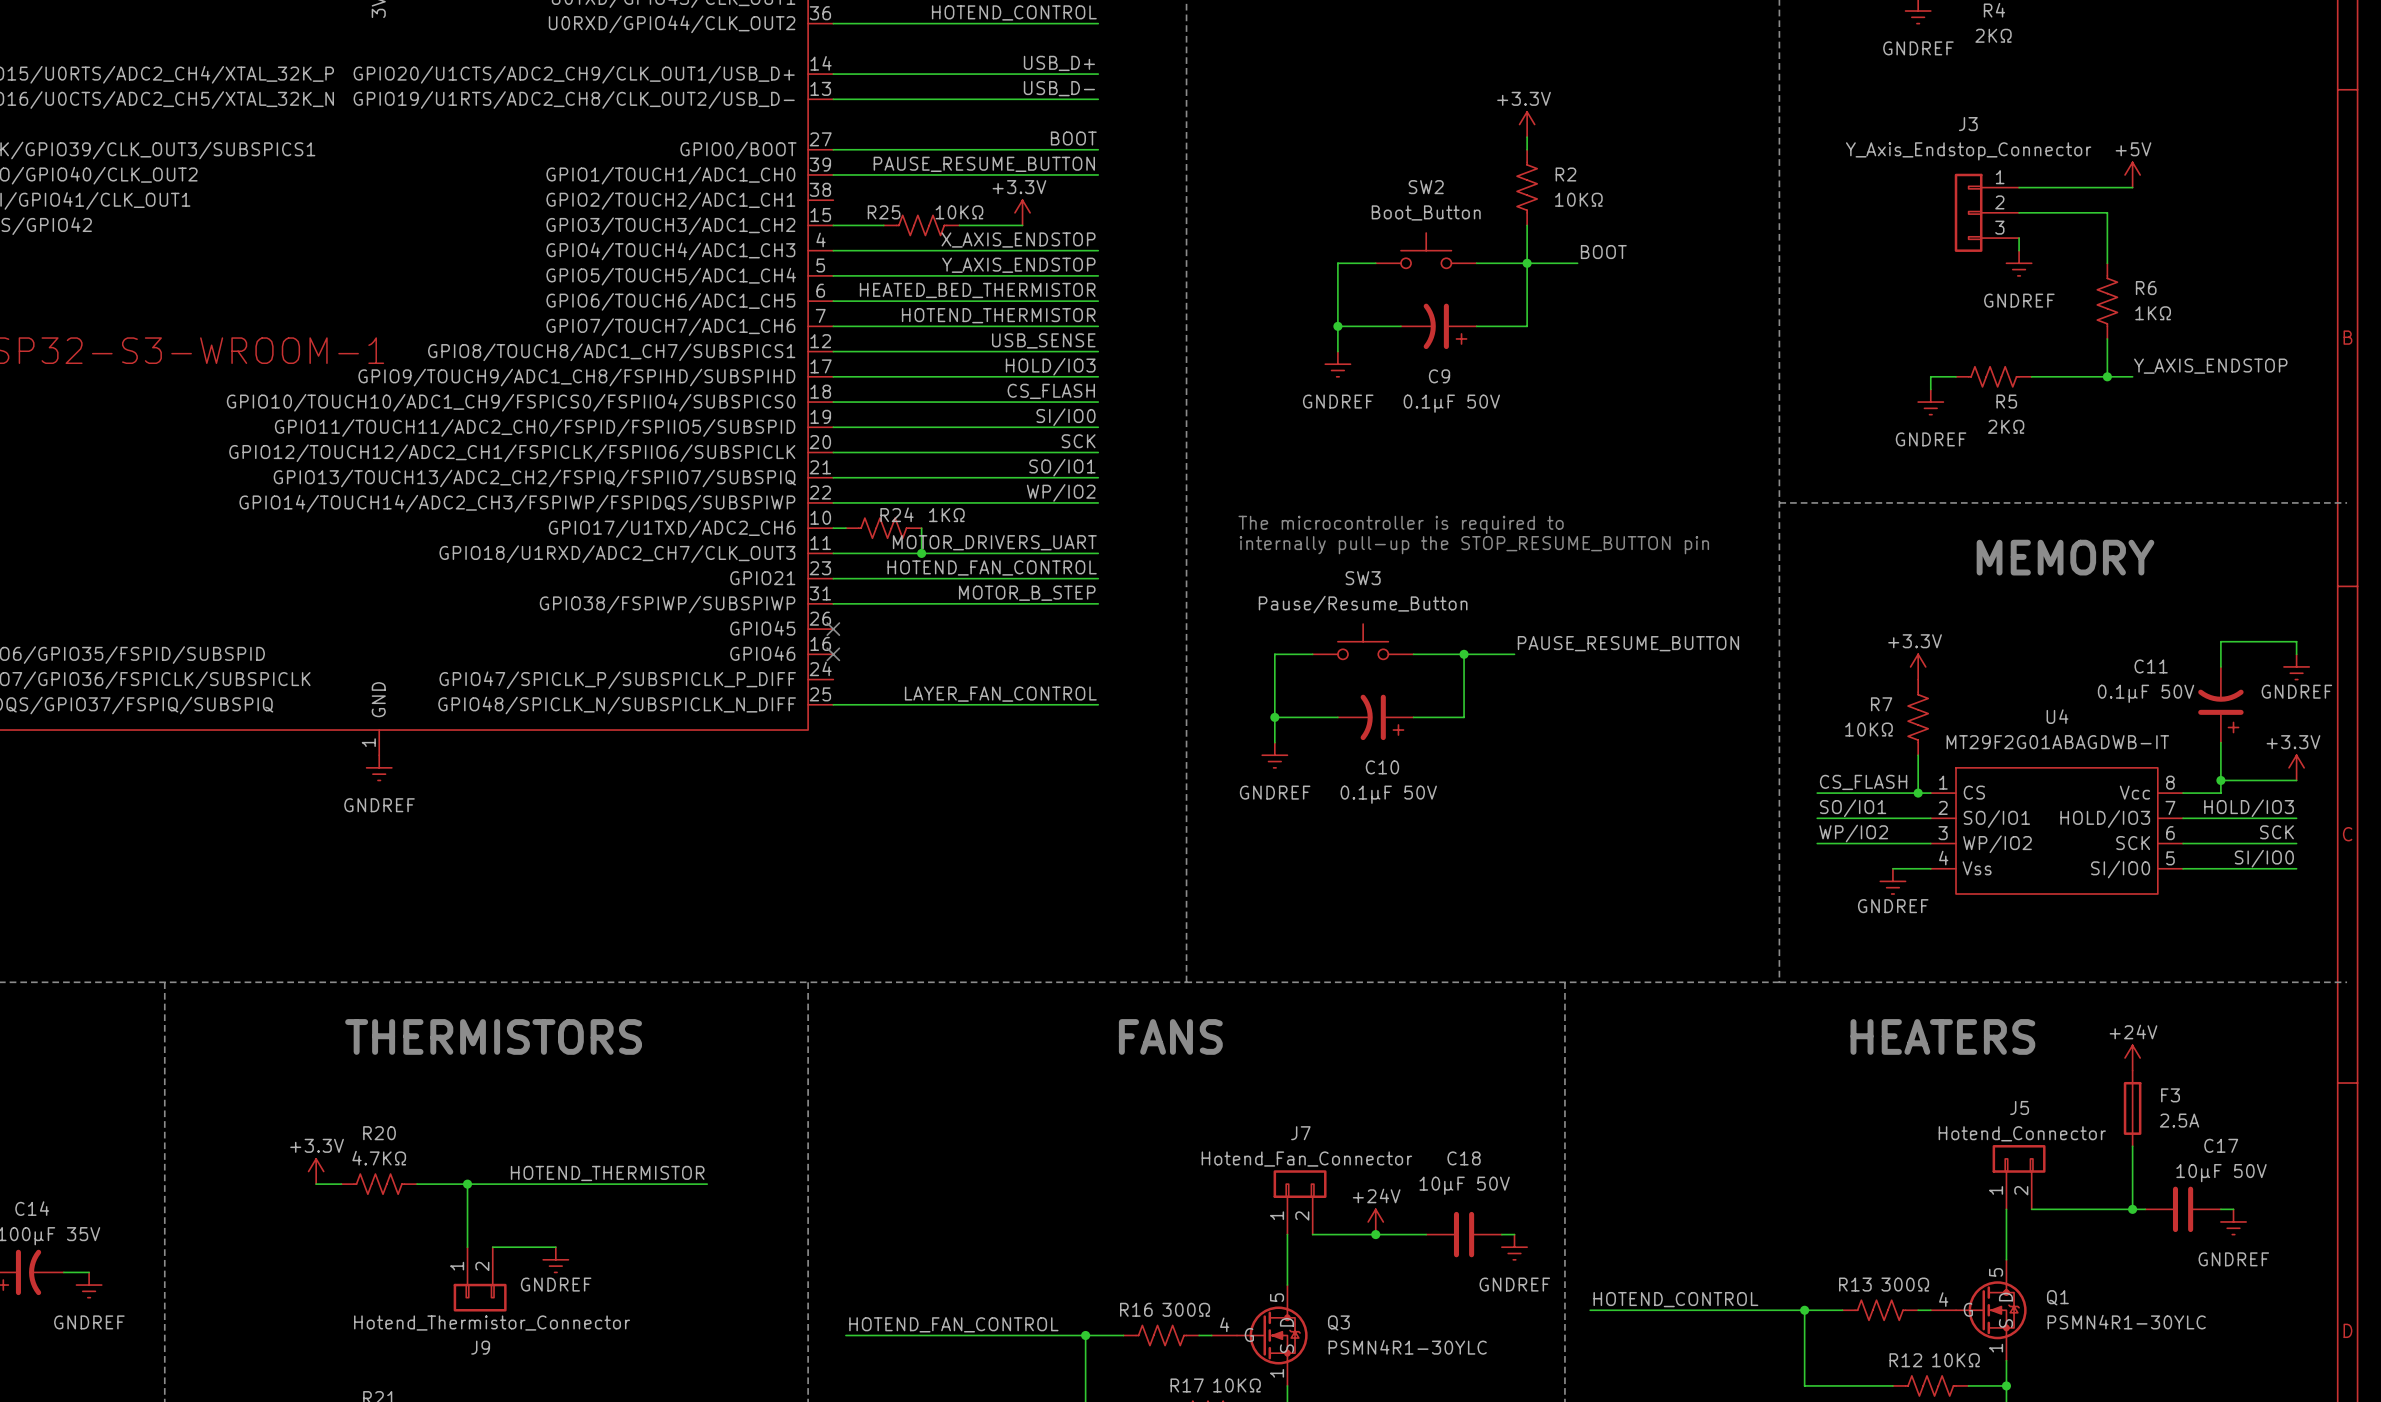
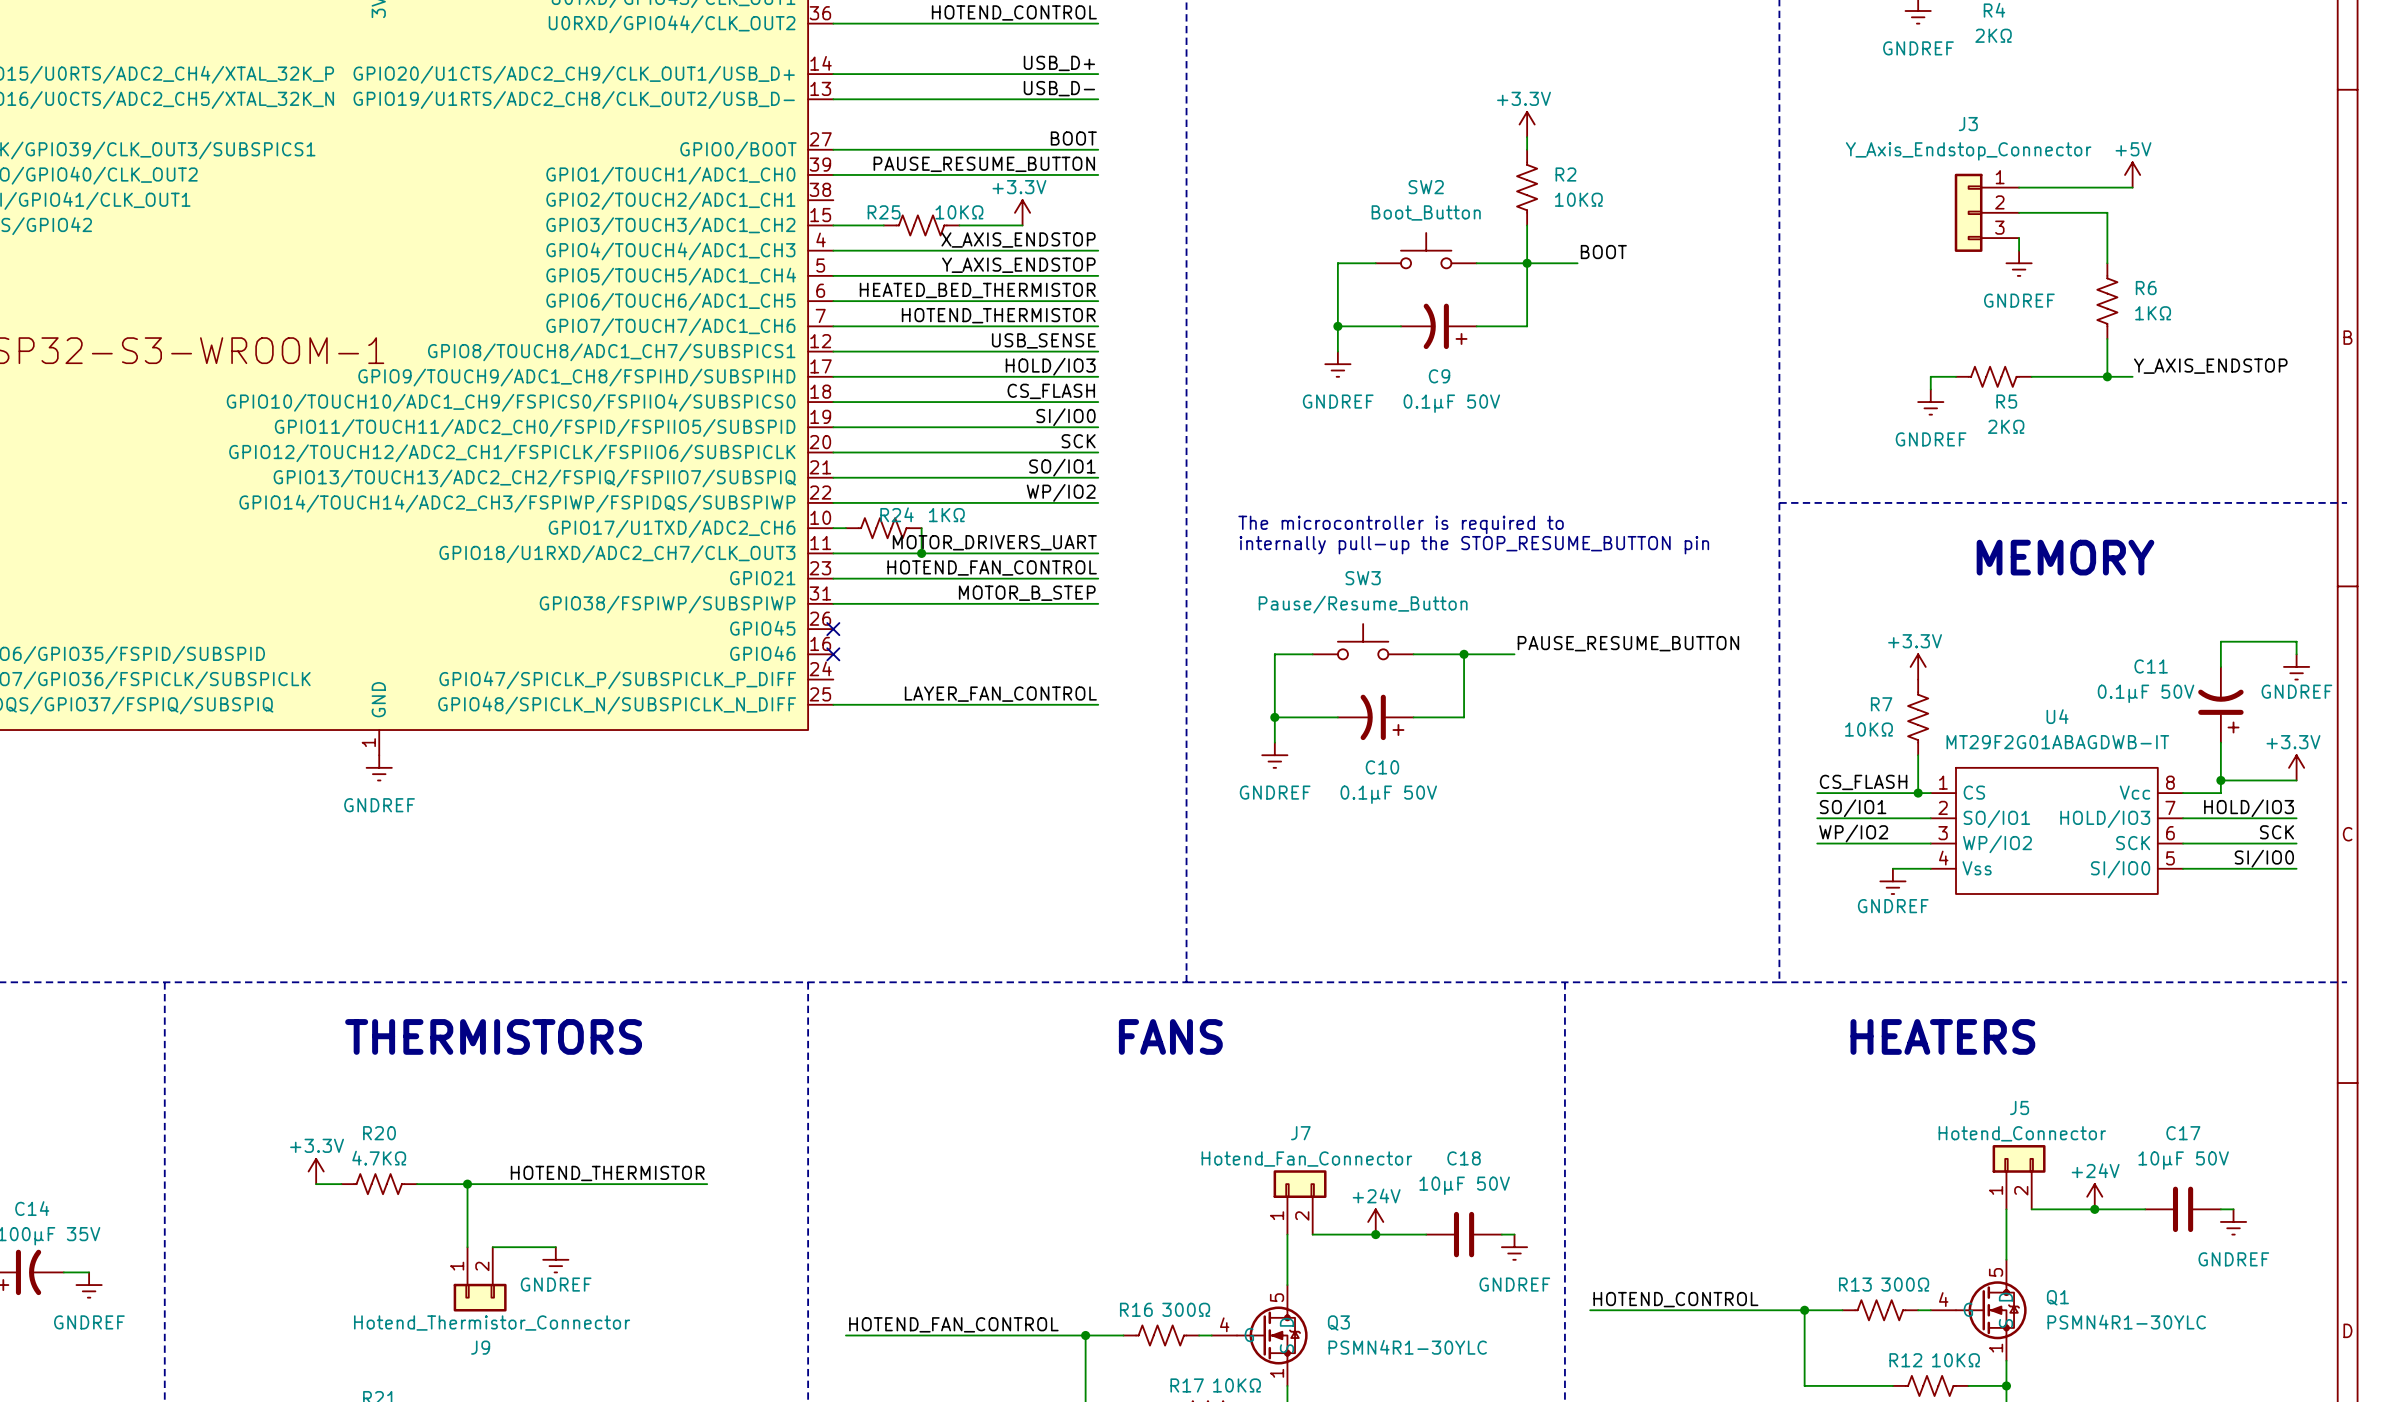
power symbol position: +24V (2132, 1057) -> +24V (2094, 1196)
F3: 2.5A (2132, 1108) -> none
C17 name position: C17 (2221, 1145) -> C17 (2183, 1133)
wire: (2132, 1146) (2132, 1209) -> none
C17 value position: 10µF 50V (2221, 1173) -> 10µF 50V (2183, 1160)
junction position: (2132, 1209) -> (2094, 1209)

